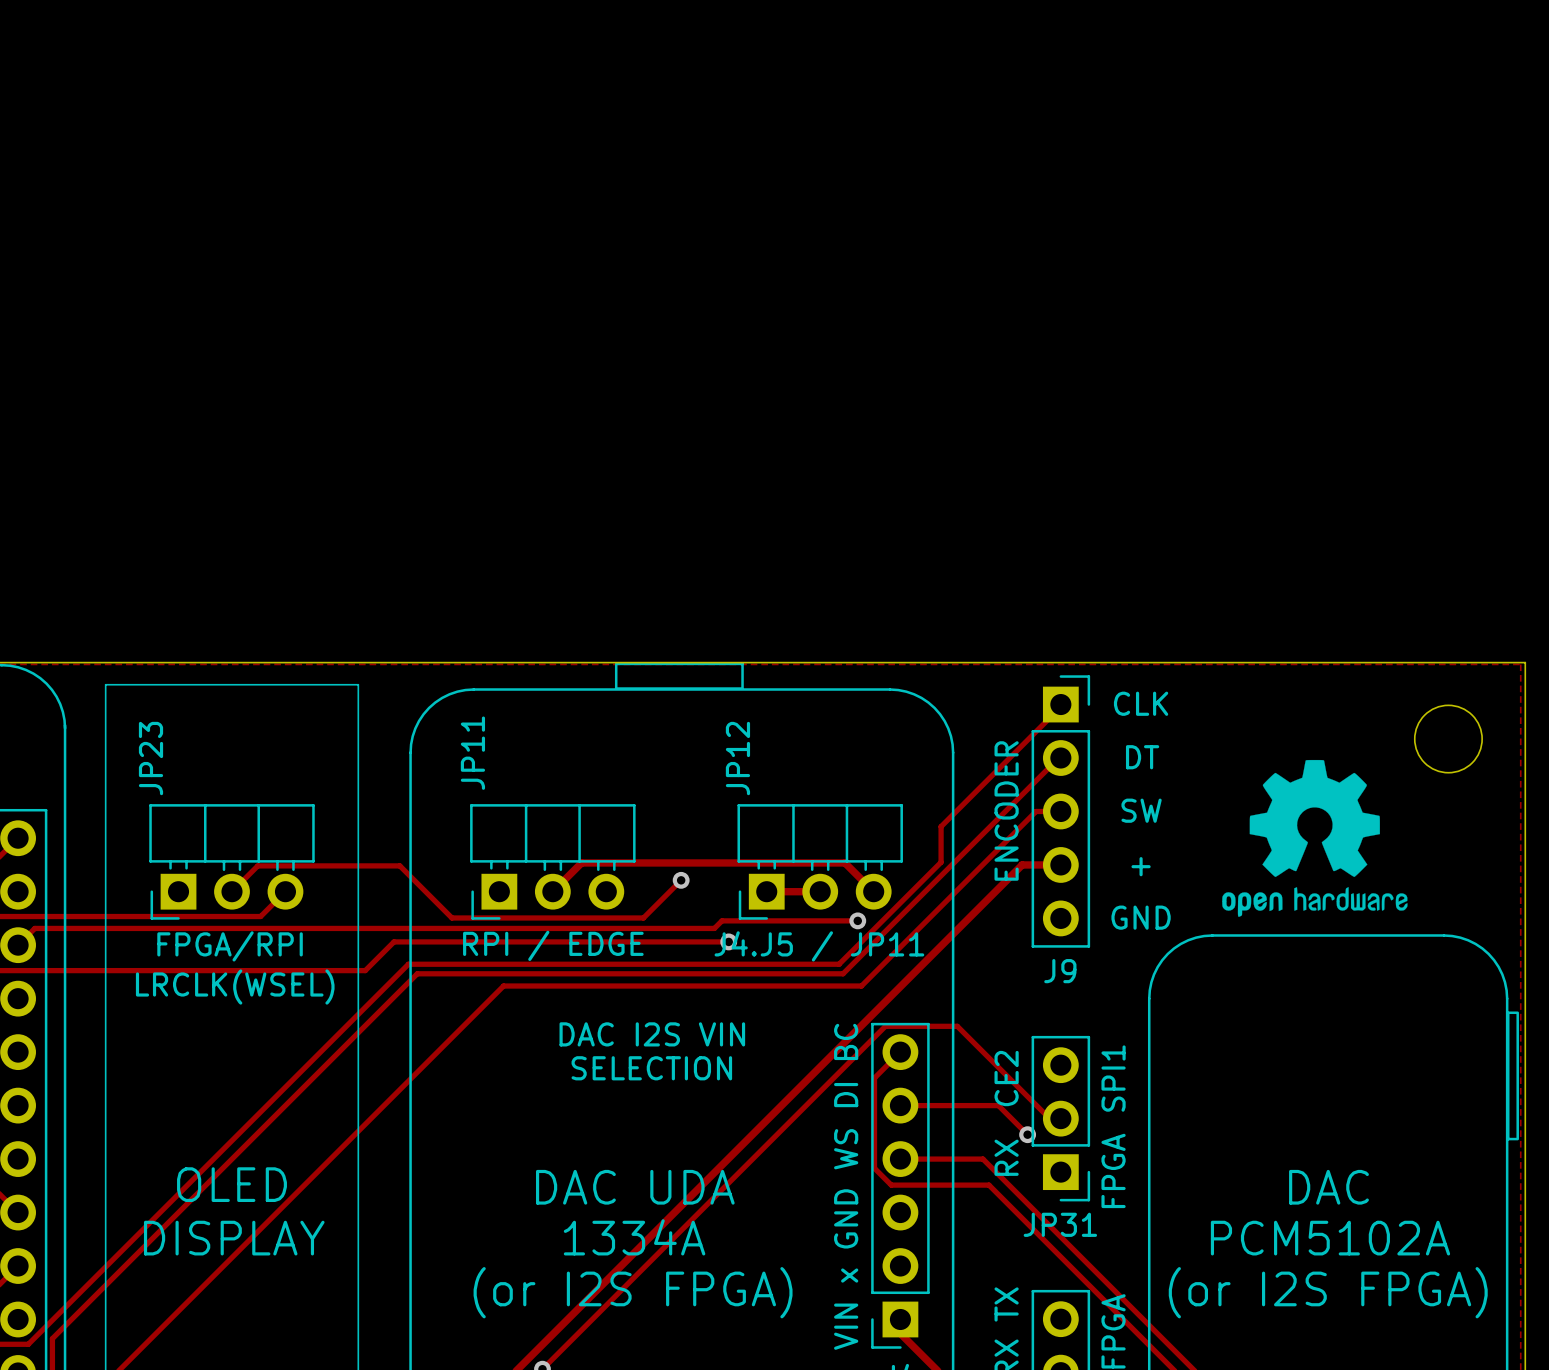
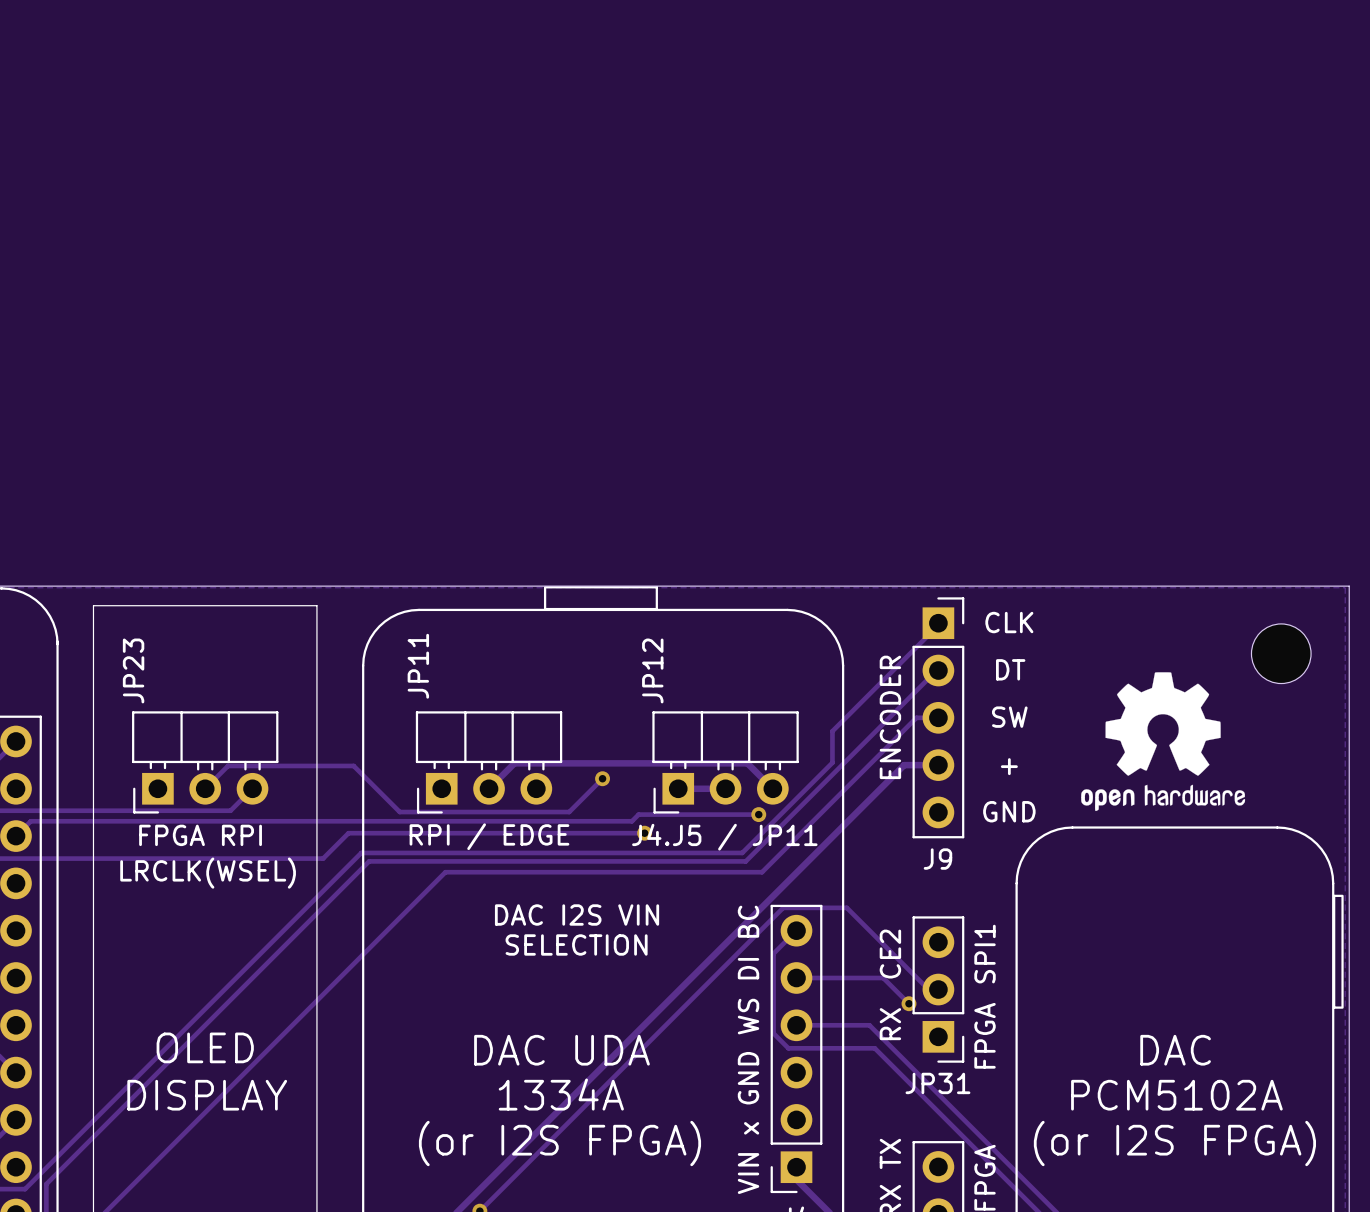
text: none -> RPI (241, 835)
text: FPGA/RPI (230, 946) -> FPGA (172, 835)

